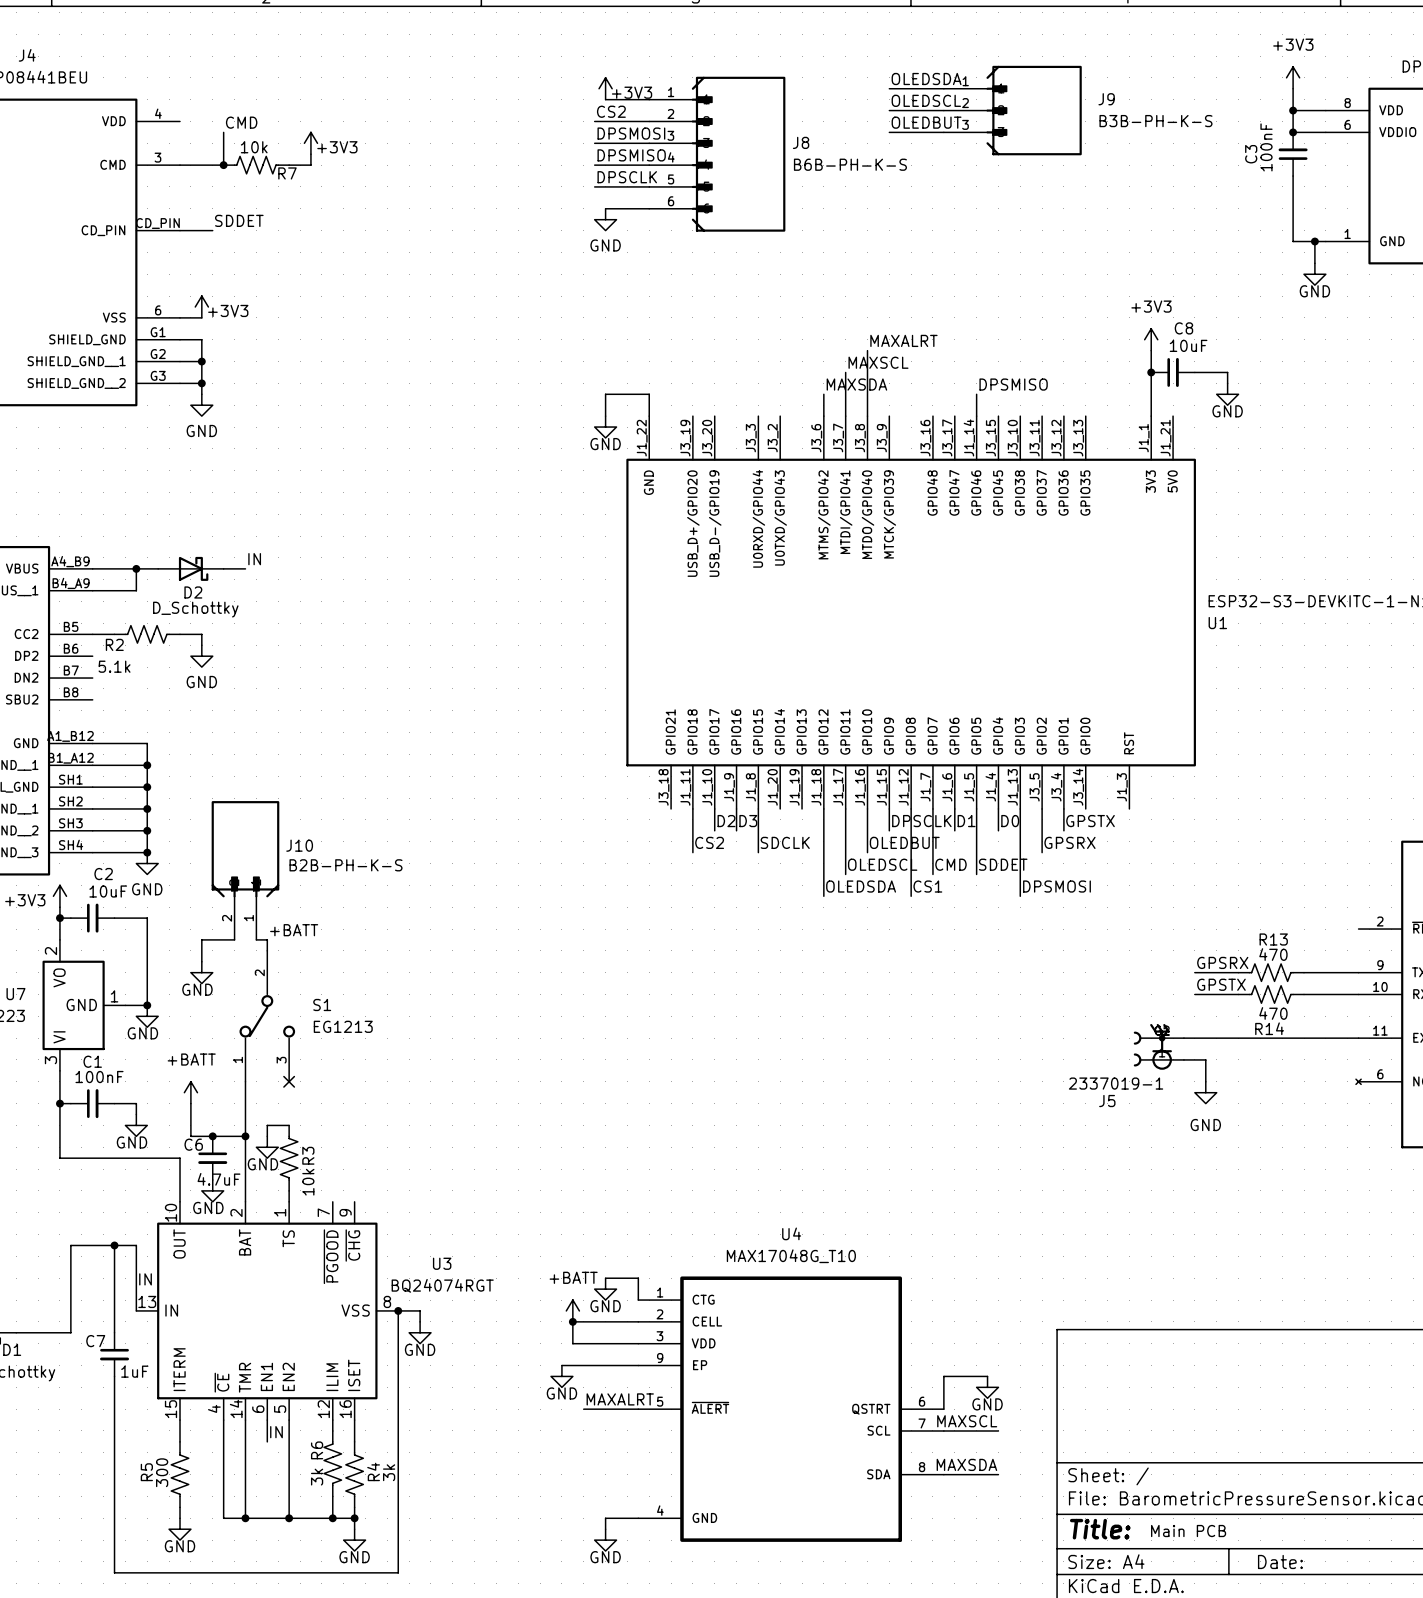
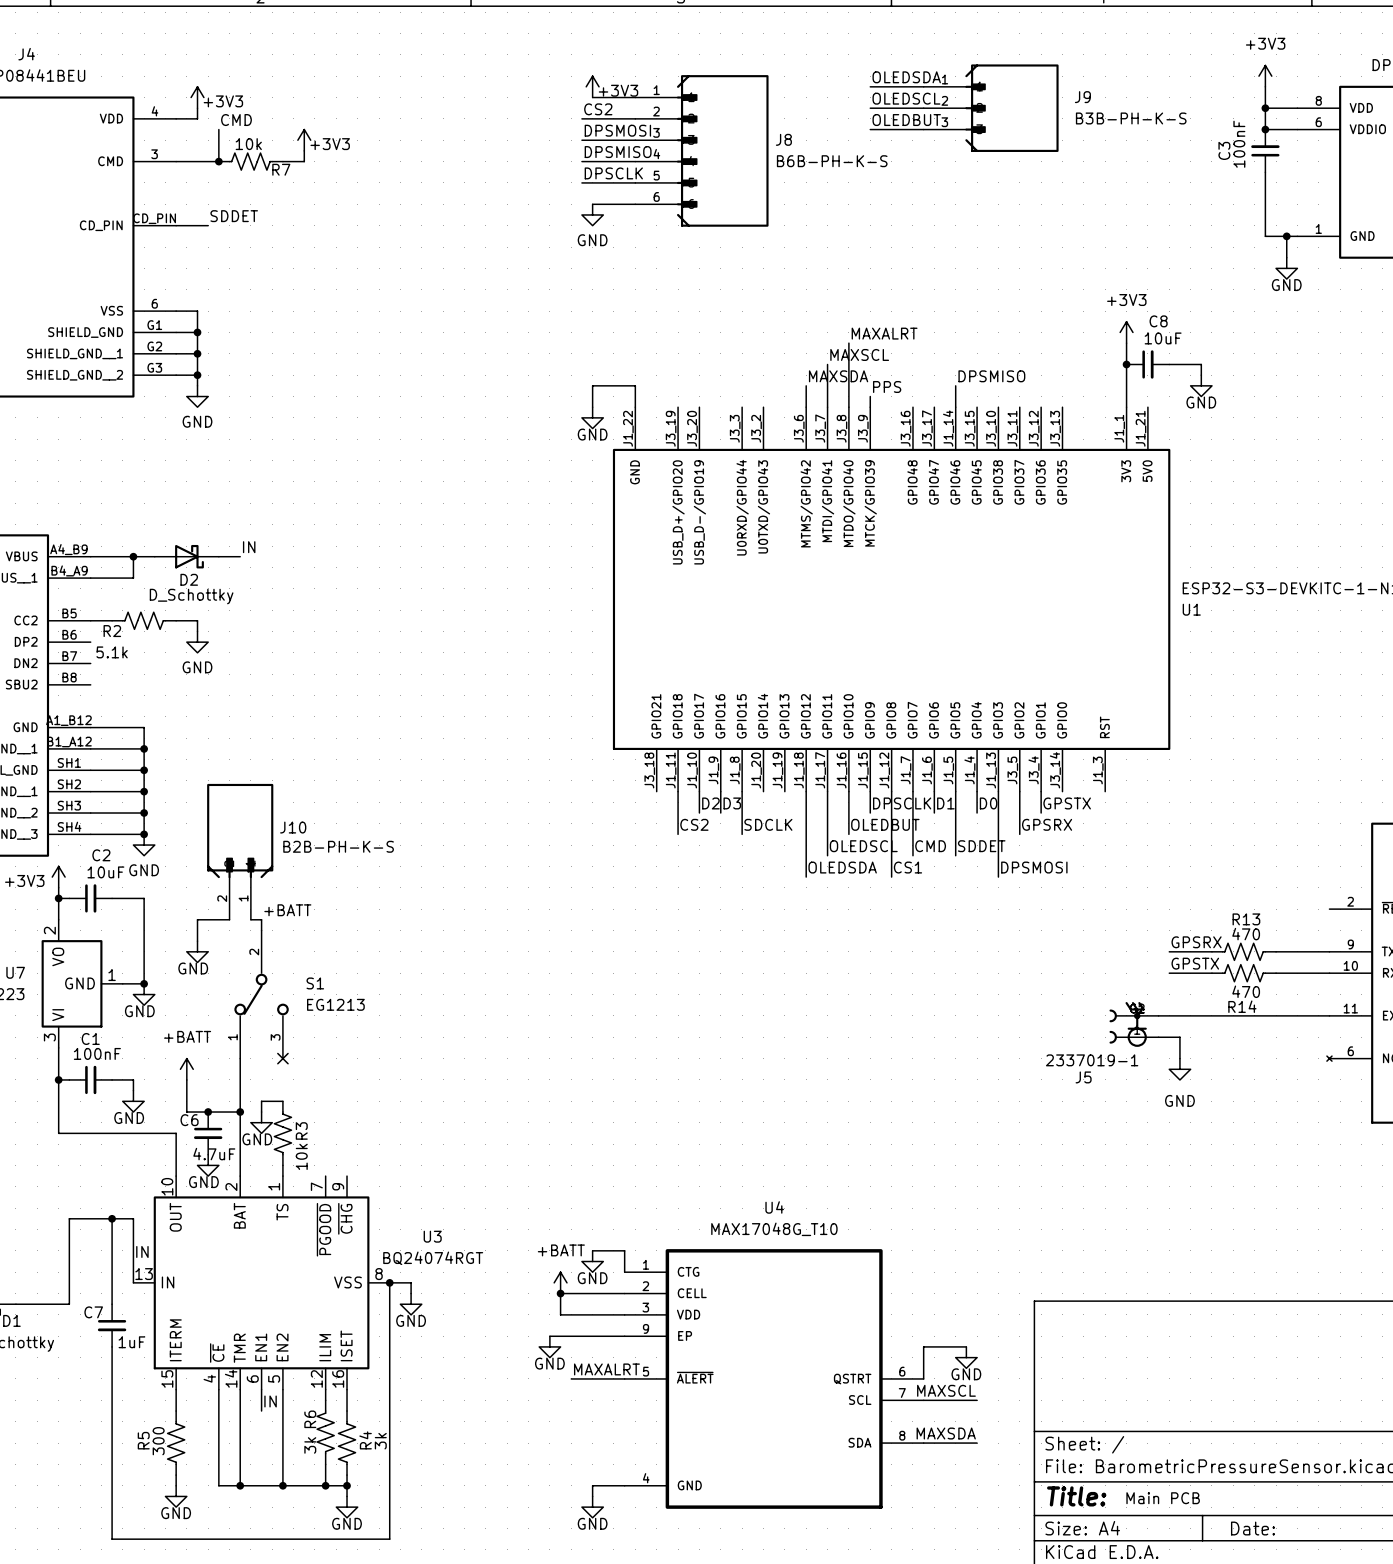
wire: none -> (197, 108) (197, 118) (176, 118)
power symbol position: +3V3 (201, 306) -> +3V3 (197, 97)
wire: none -> (197, 311) (197, 332)
junction: none -> (197, 332)
label: none -> PPS (887, 387)
wire: none -> (870, 396) (870, 407)

